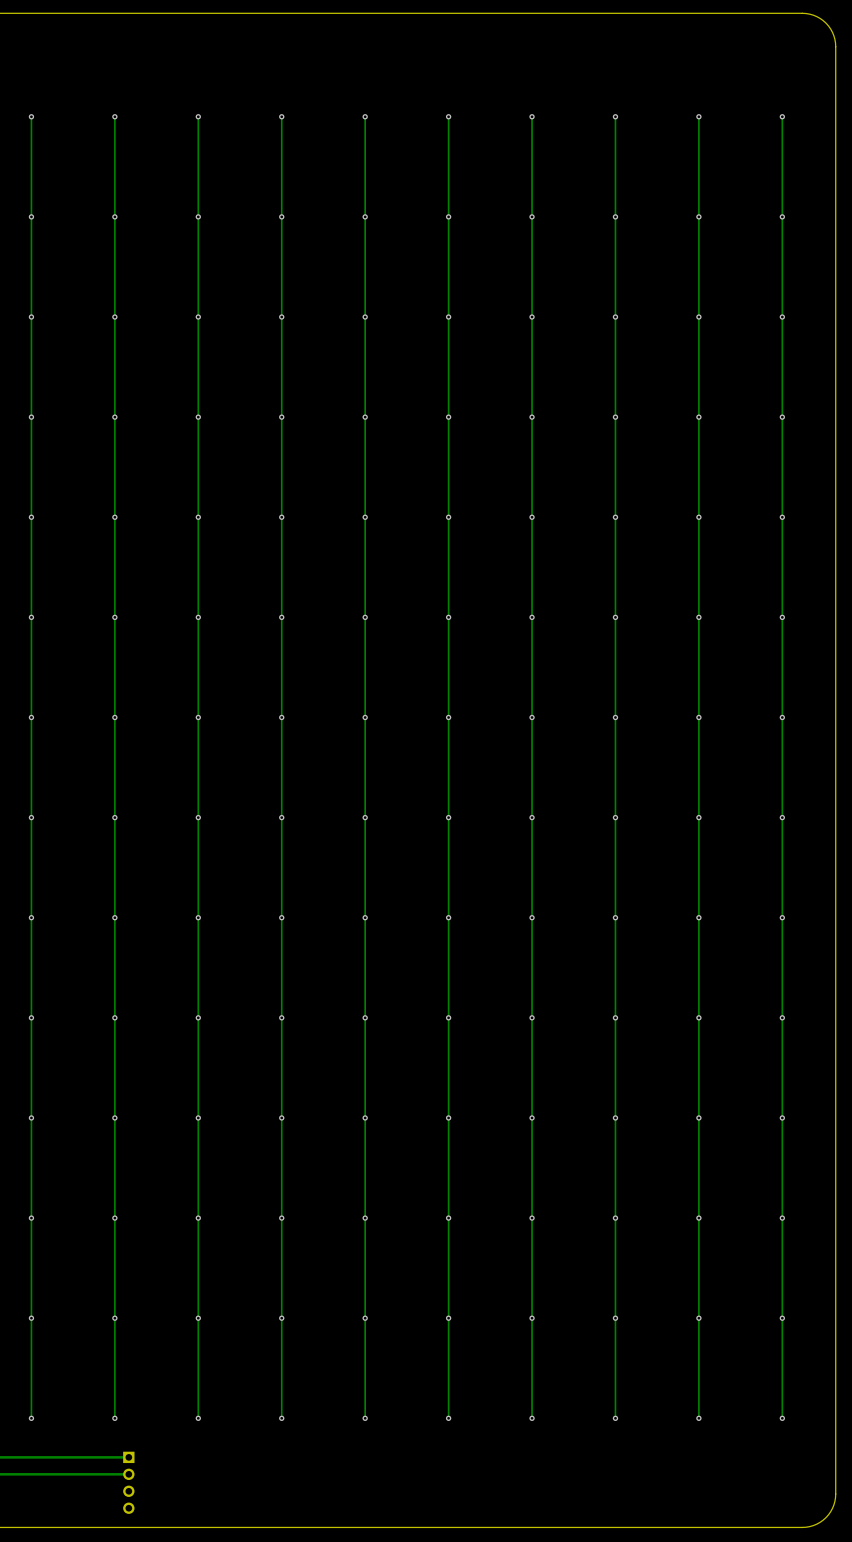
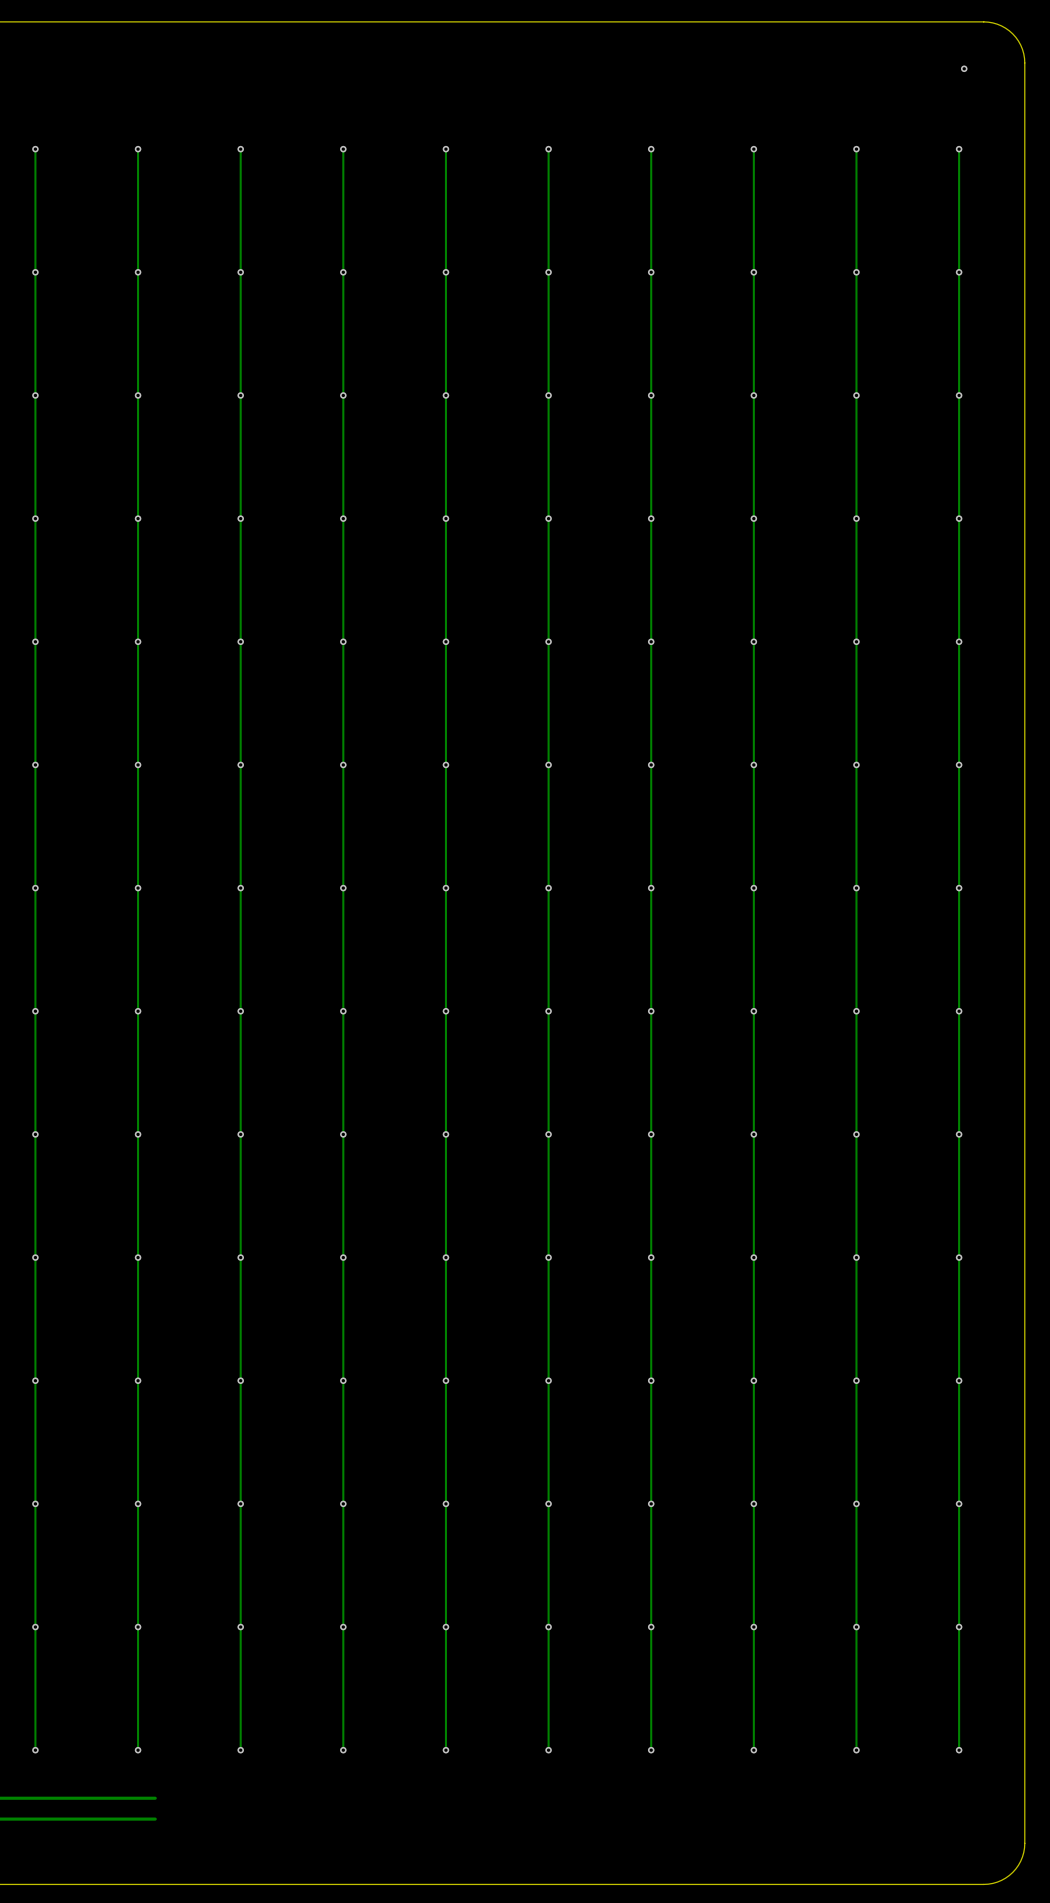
via: none -> (964, 68)
part: (128, 1482) -> none

